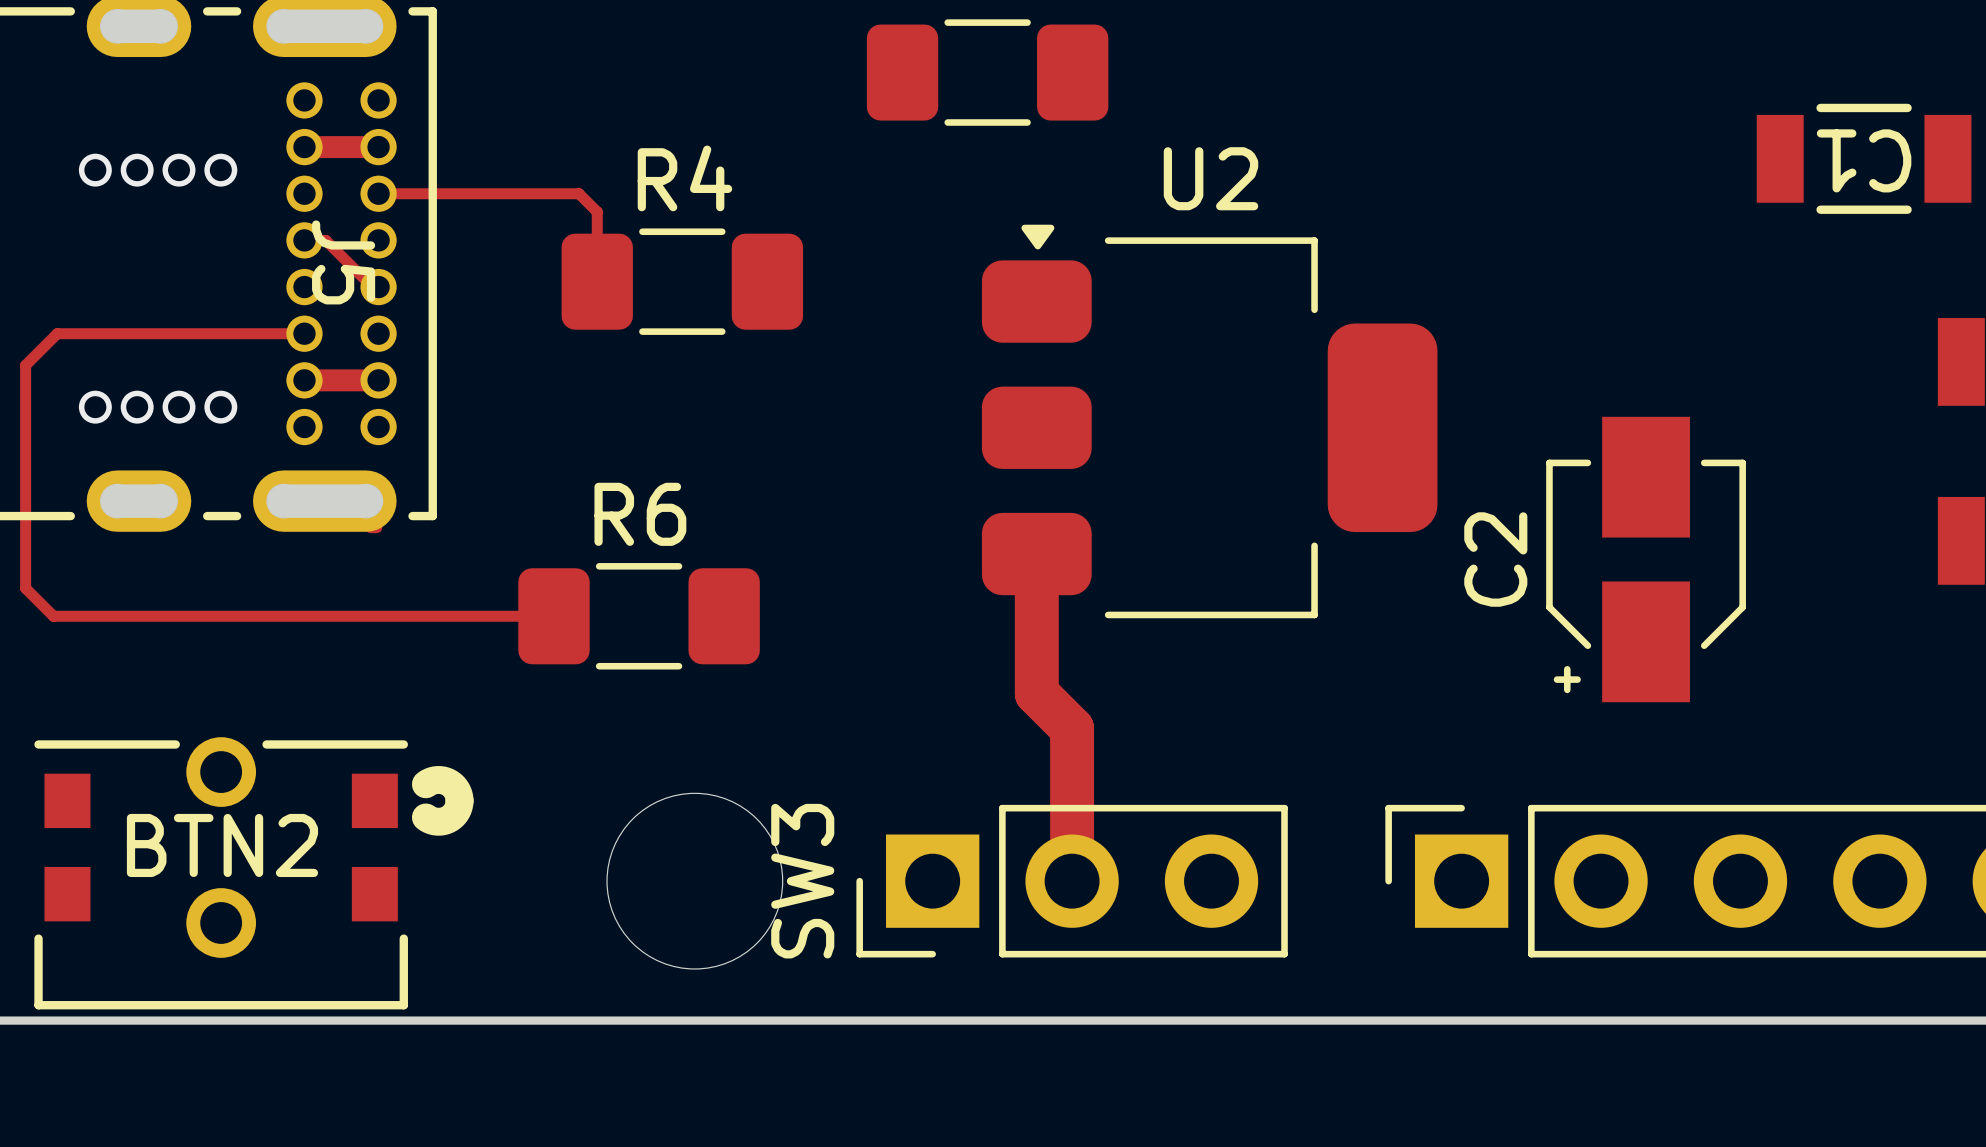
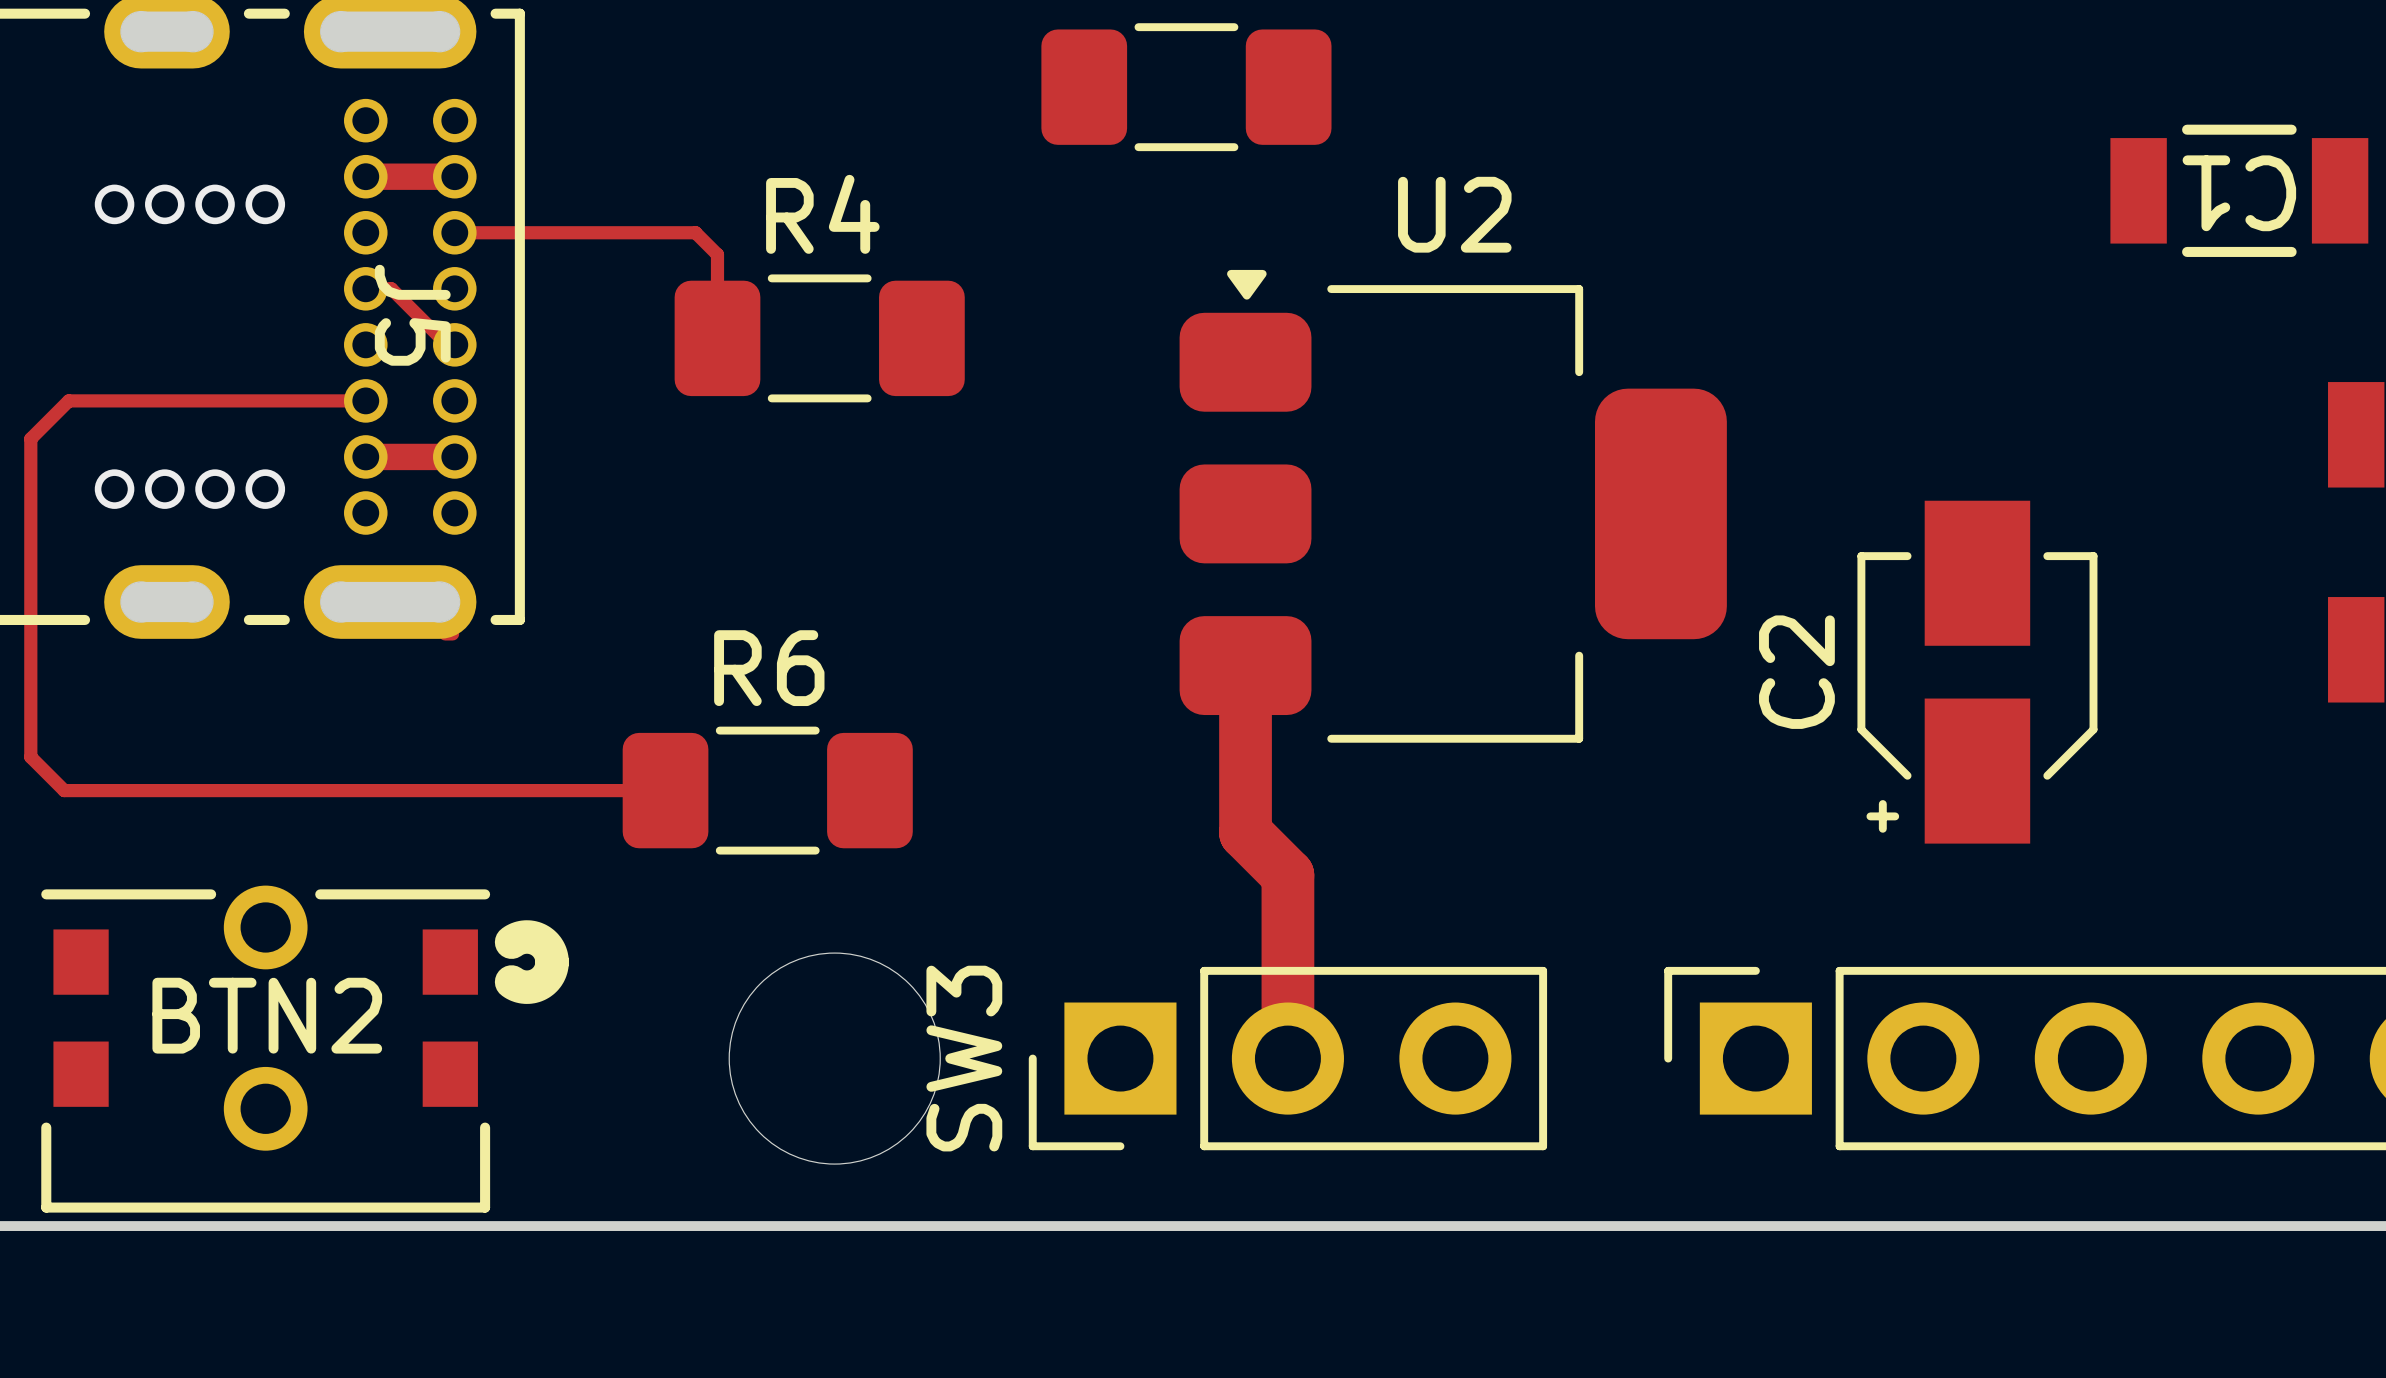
track: (25, 588) (53, 616) (554, 616) -> (30, 706) (30, 757) (64, 790) (665, 790)
R6 position: (639, 616) -> (767, 790)

